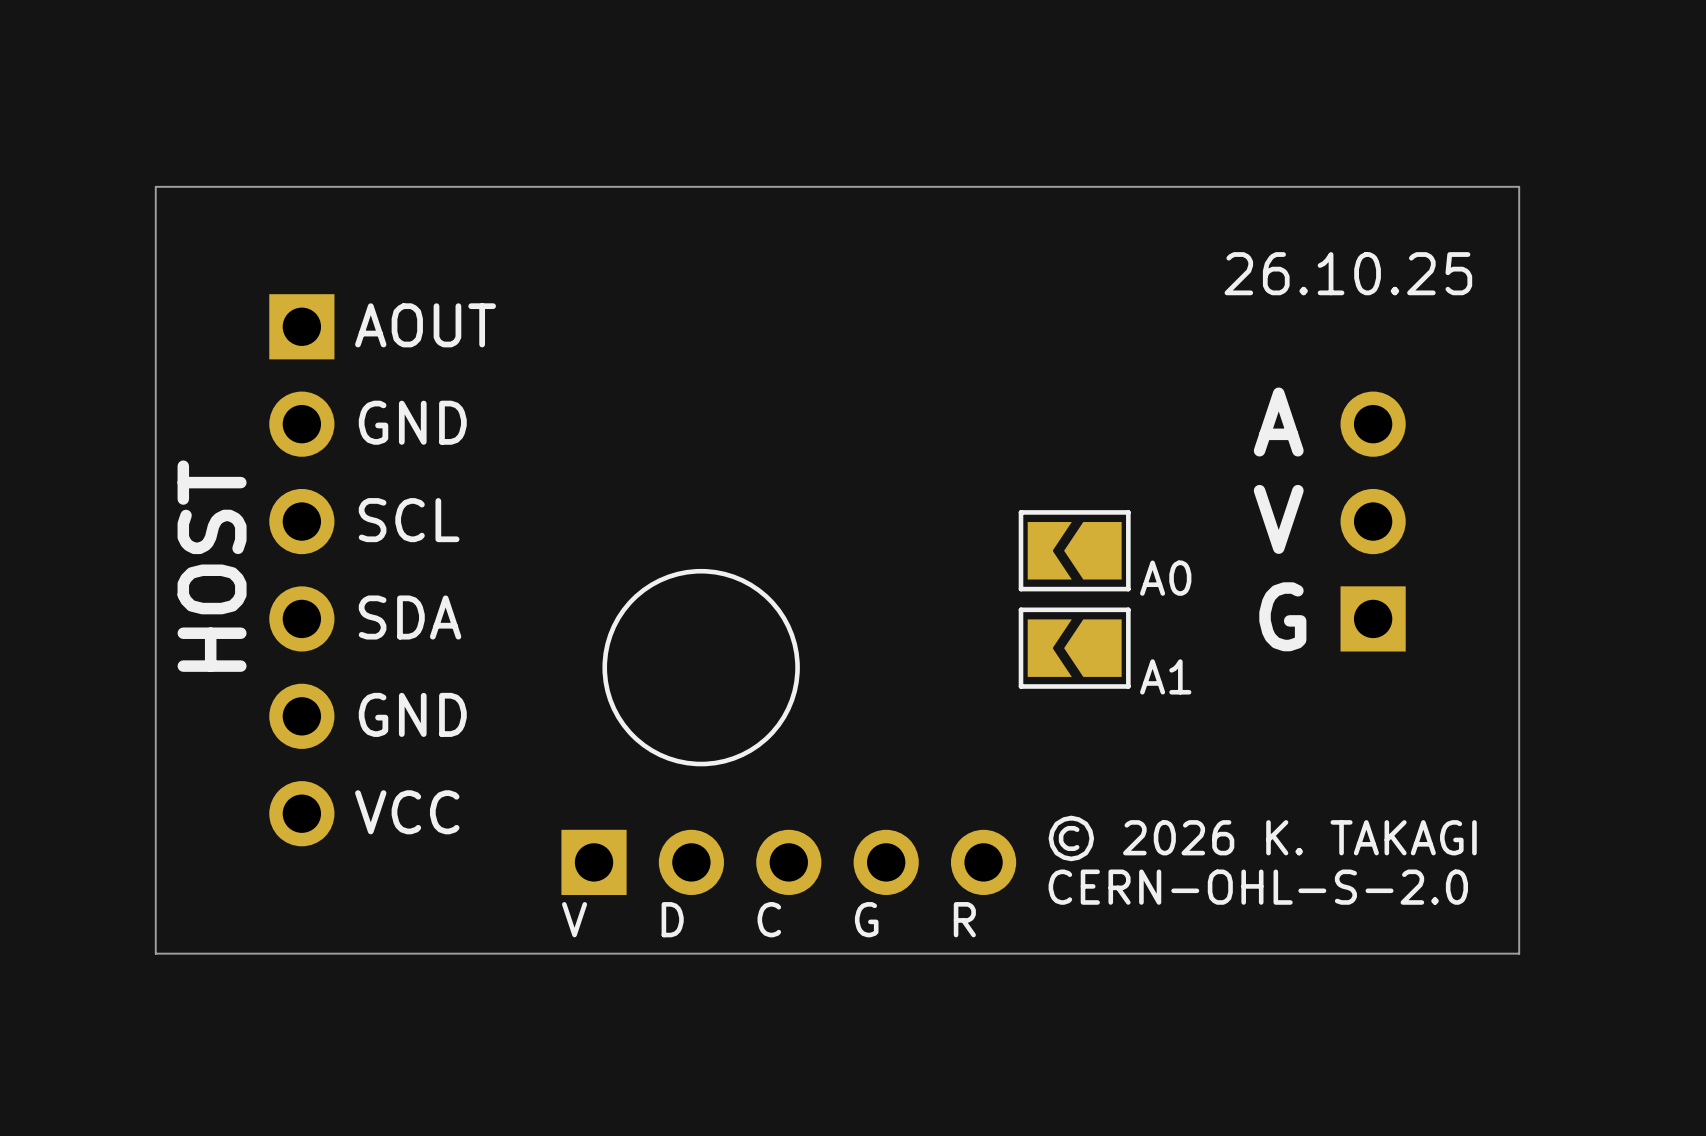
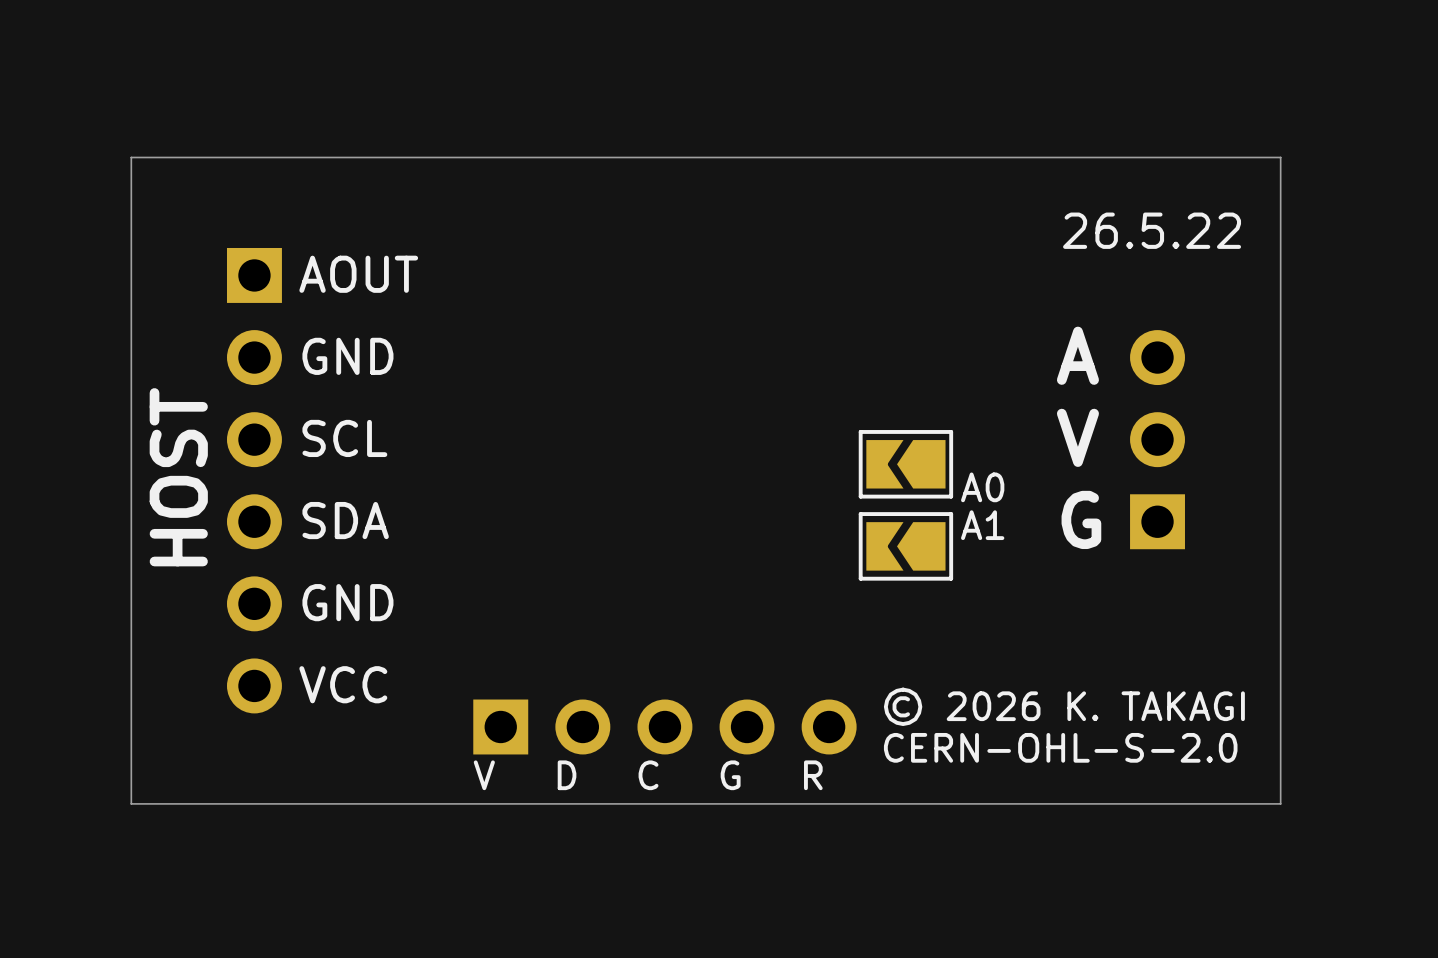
text: 26.10.25 (1348, 273) -> 26.5.22 (1152, 230)
drawing: [602, 568, 800, 767] -> none
text position: A1 (1165, 676) -> A1 (982, 525)

